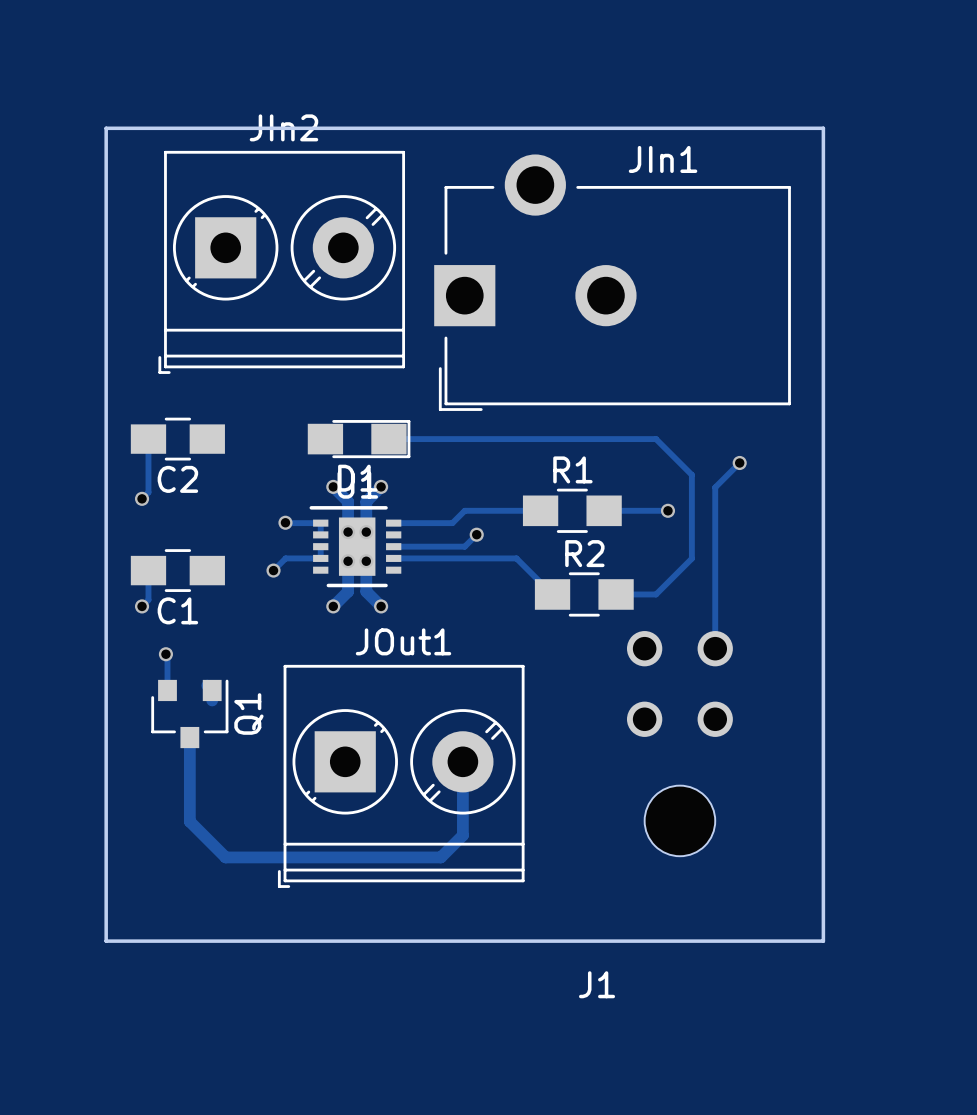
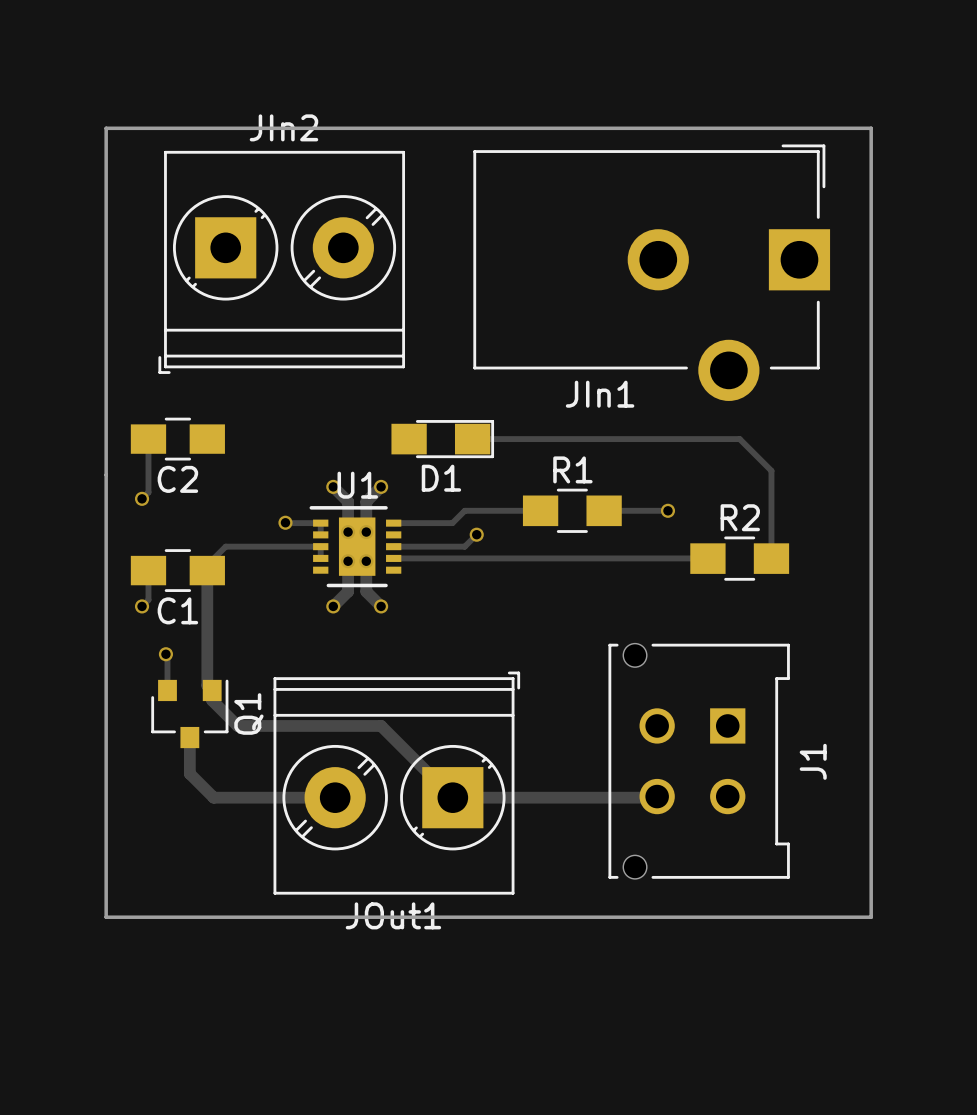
board edge: (823, 128) (823, 941) (106, 941) (106, 917) -> (823, 128) (871, 128) (871, 917) (106, 917)
JIn1 rotation: 0° (612, 282) -> 180° (651, 272)
D1 position: (359, 439) -> (442, 439)
track: (388, 439) (472, 439) -> none
track: (656, 439) (691, 474) (691, 558) (656, 594) (616, 594) -> (656, 439) (739, 439) (771, 470) (771, 558)
track: (739, 462) (715, 487) (715, 648) -> none
via: (739, 462) -> none
track: none -> (320, 546) (225, 546) (207, 565) (207, 685)
track: (320, 558) (285, 558) (273, 570) -> none
track: (516, 558) (552, 594) -> (516, 558) (707, 558)
via: (273, 570) -> none
R2 position: (584, 594) -> (739, 558)
J1 footprint: [626, 631, 733, 857] -> [608, 643, 790, 879]
track: none -> (212, 700) (237, 725) (381, 725) (452, 797) (657, 796)
track: (462, 761) (462, 835) (440, 857) (225, 857) (189, 821) (189, 773) -> (335, 797) (213, 797) (189, 773)
JOut1 rotation: 0° (401, 776) -> 180° (396, 783)
J1 name position: J1 (597, 984) -> J1 (813, 761)

